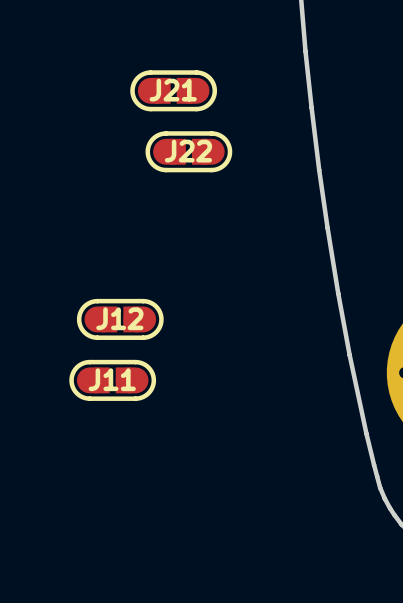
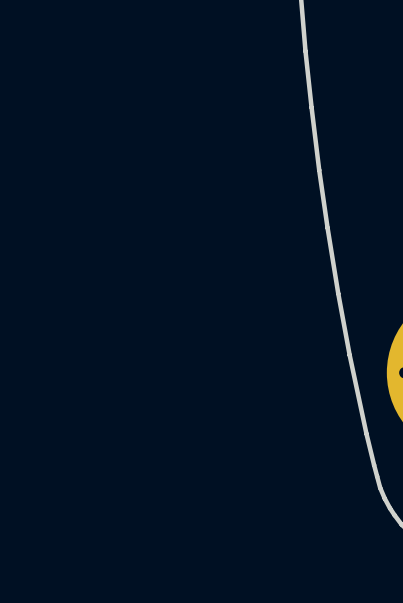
J21: (173, 90) -> none
J22: (188, 151) -> none
J12: (120, 319) -> none
J11: (112, 380) -> none

